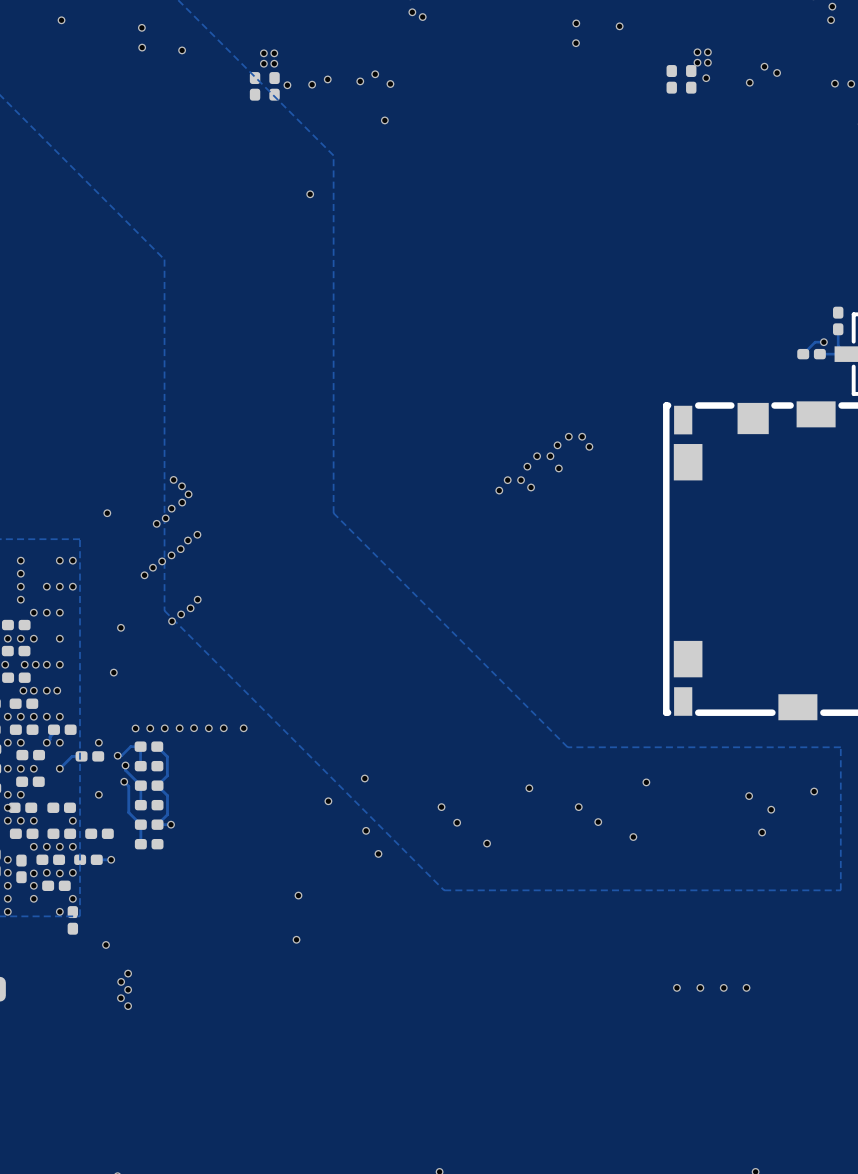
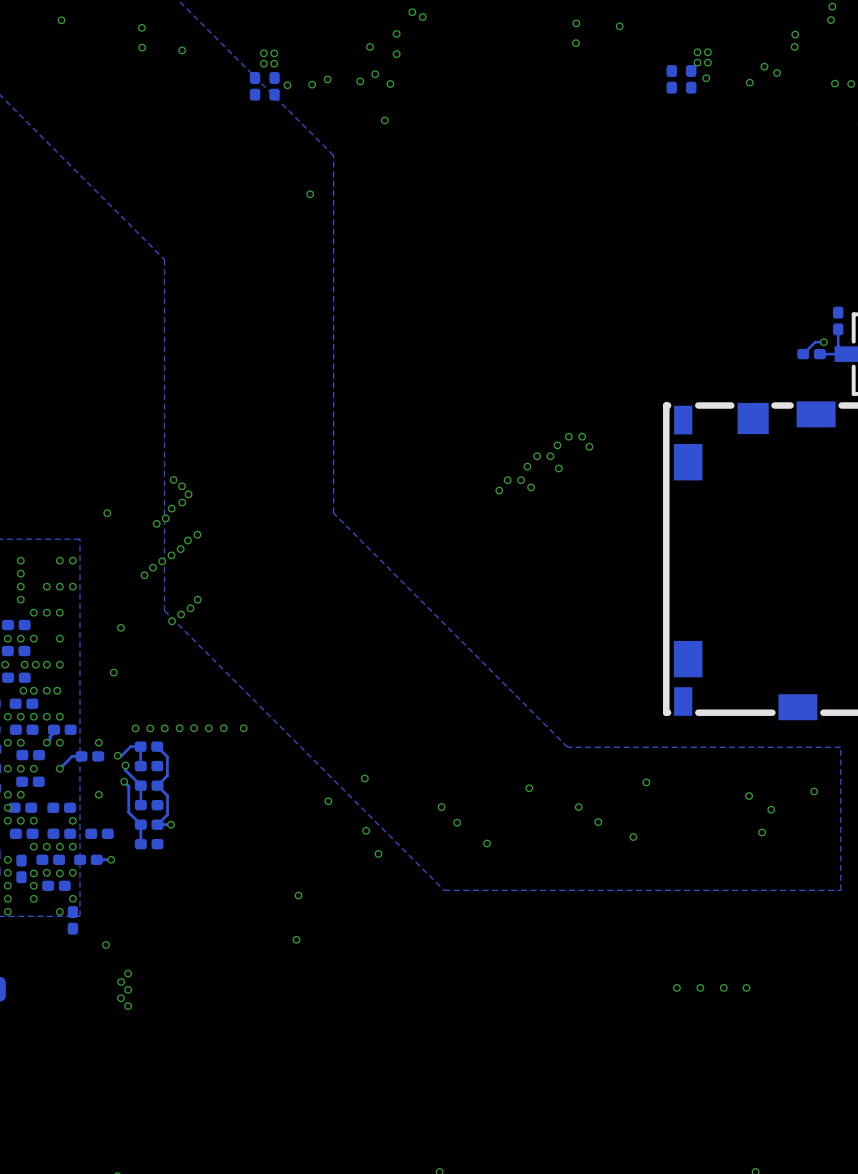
via: none -> (396, 33)
via: none -> (795, 34)
via: none -> (370, 46)
via: none -> (794, 46)
via: none -> (396, 54)

